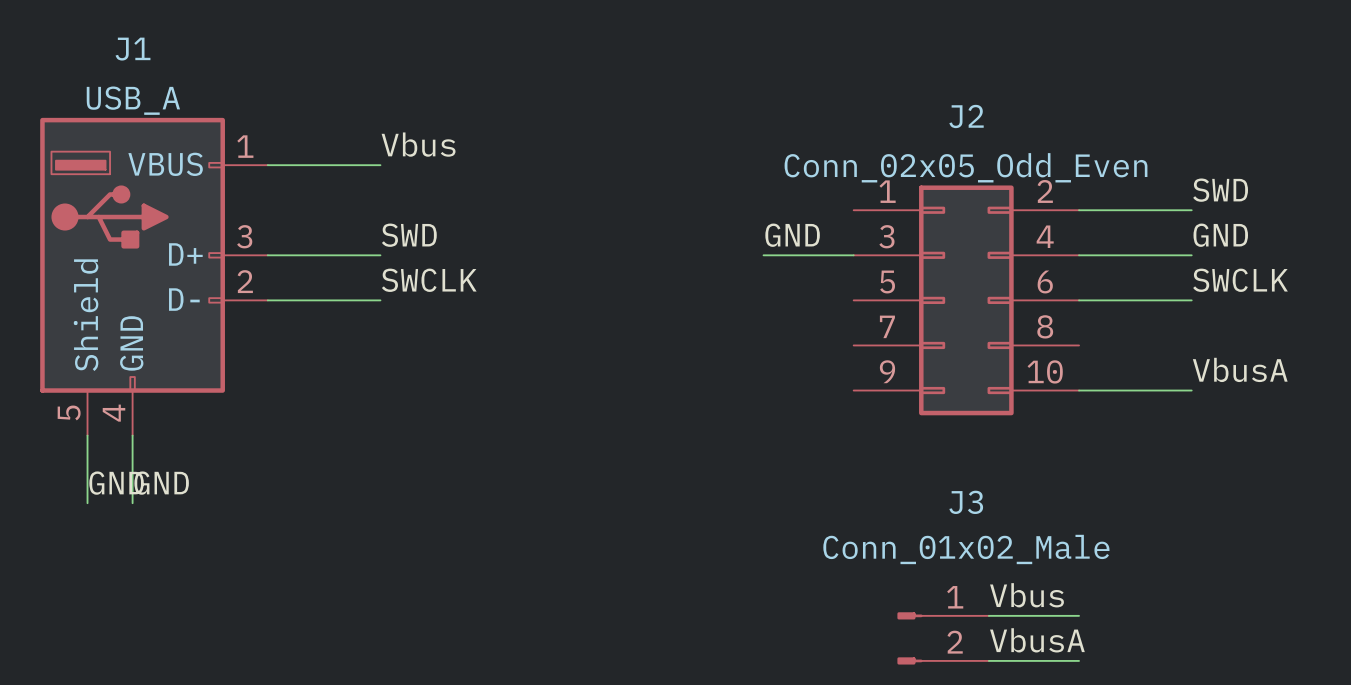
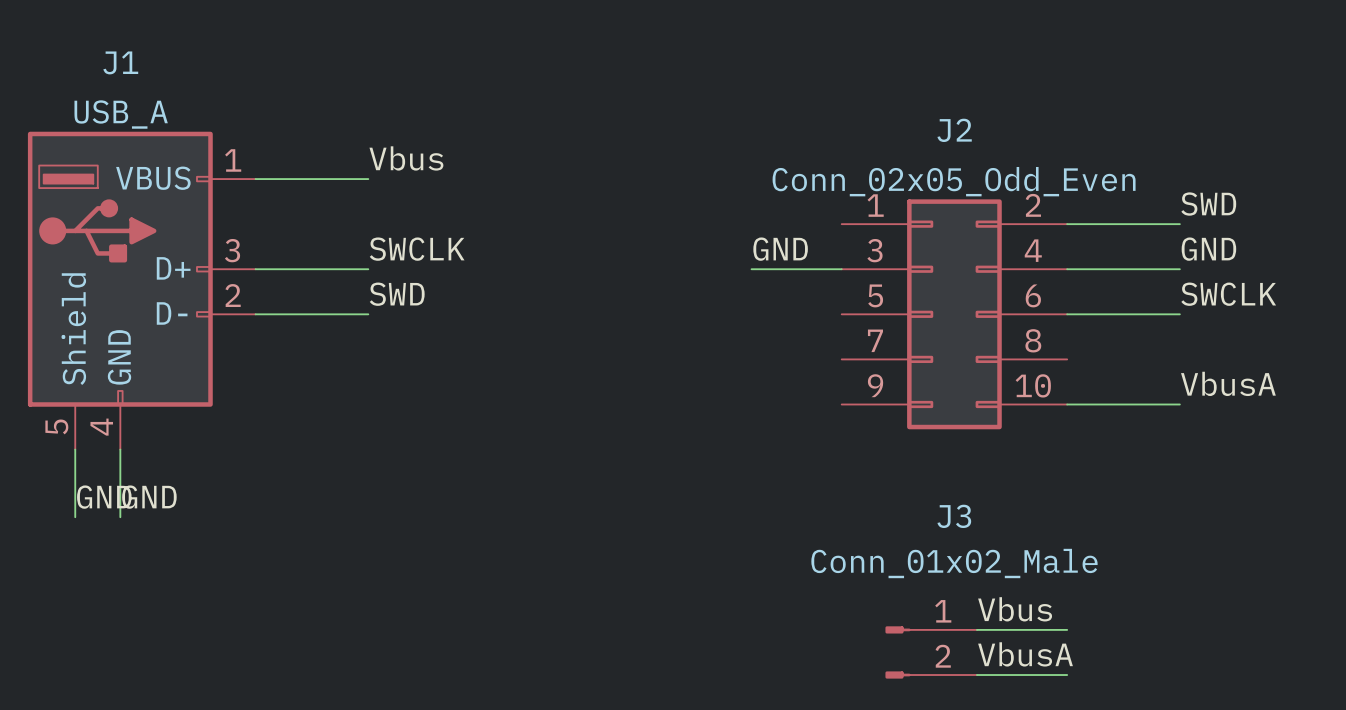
label: SWD (409, 235) -> SWCLK (417, 249)
label: SWCLK (429, 280) -> SWD (397, 294)

